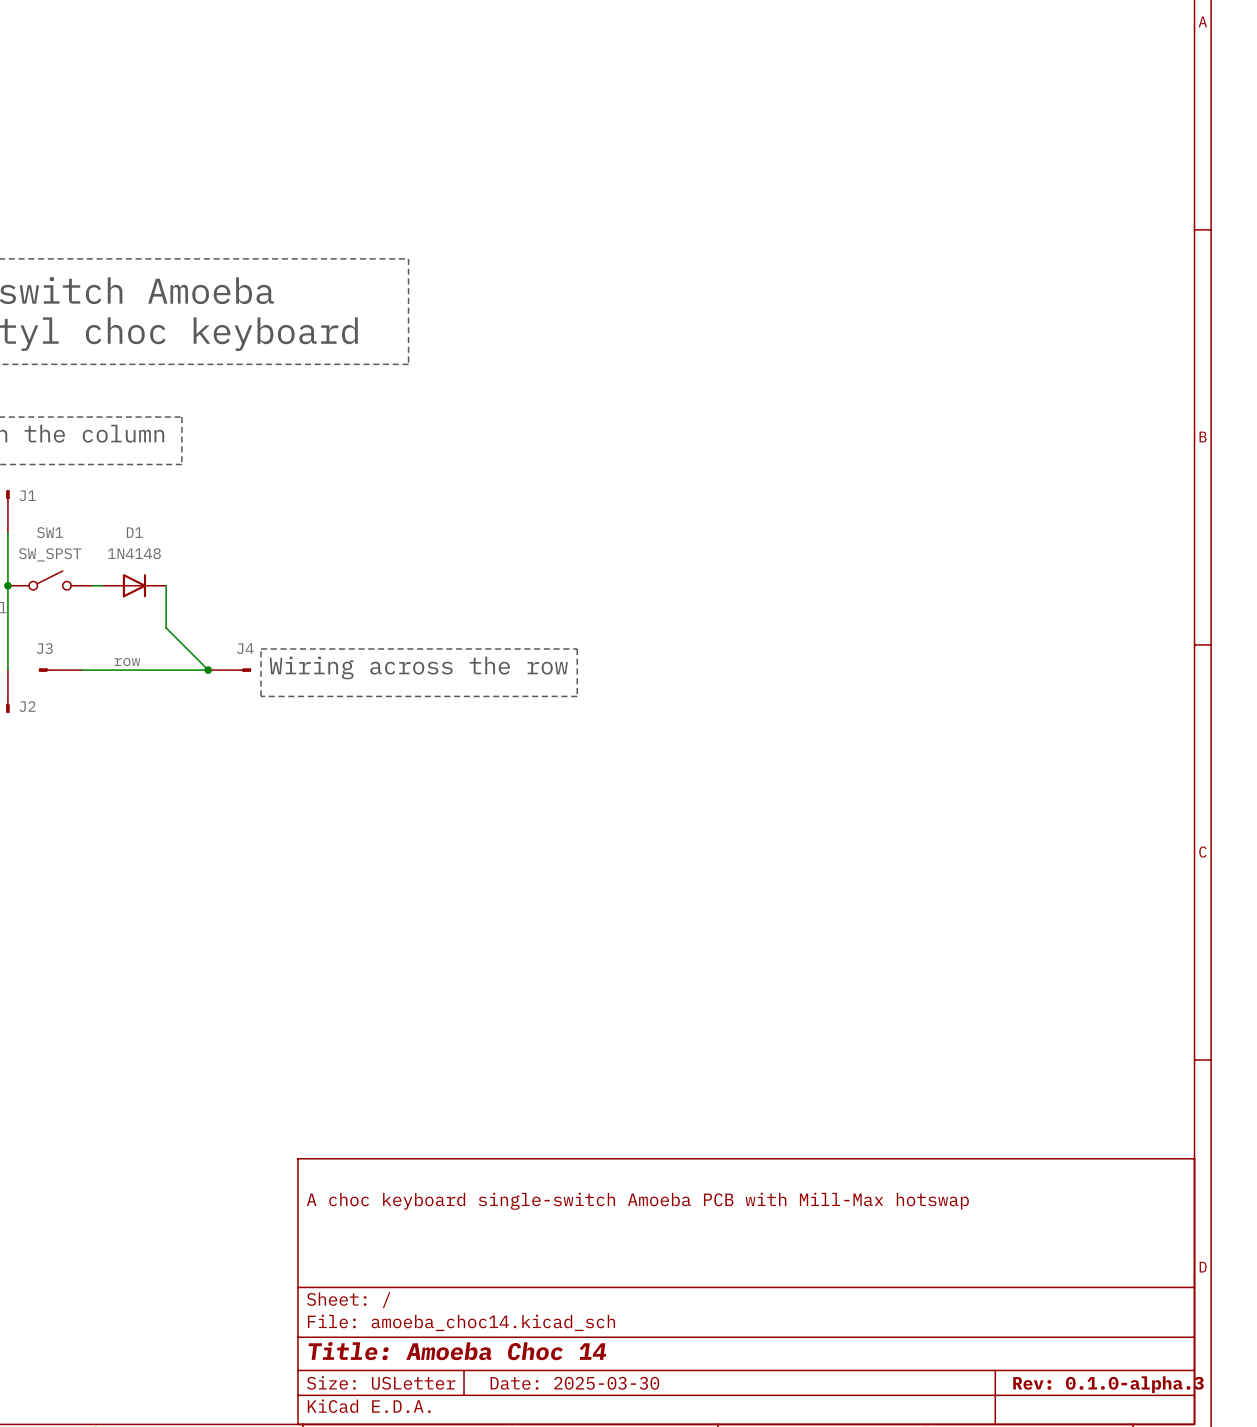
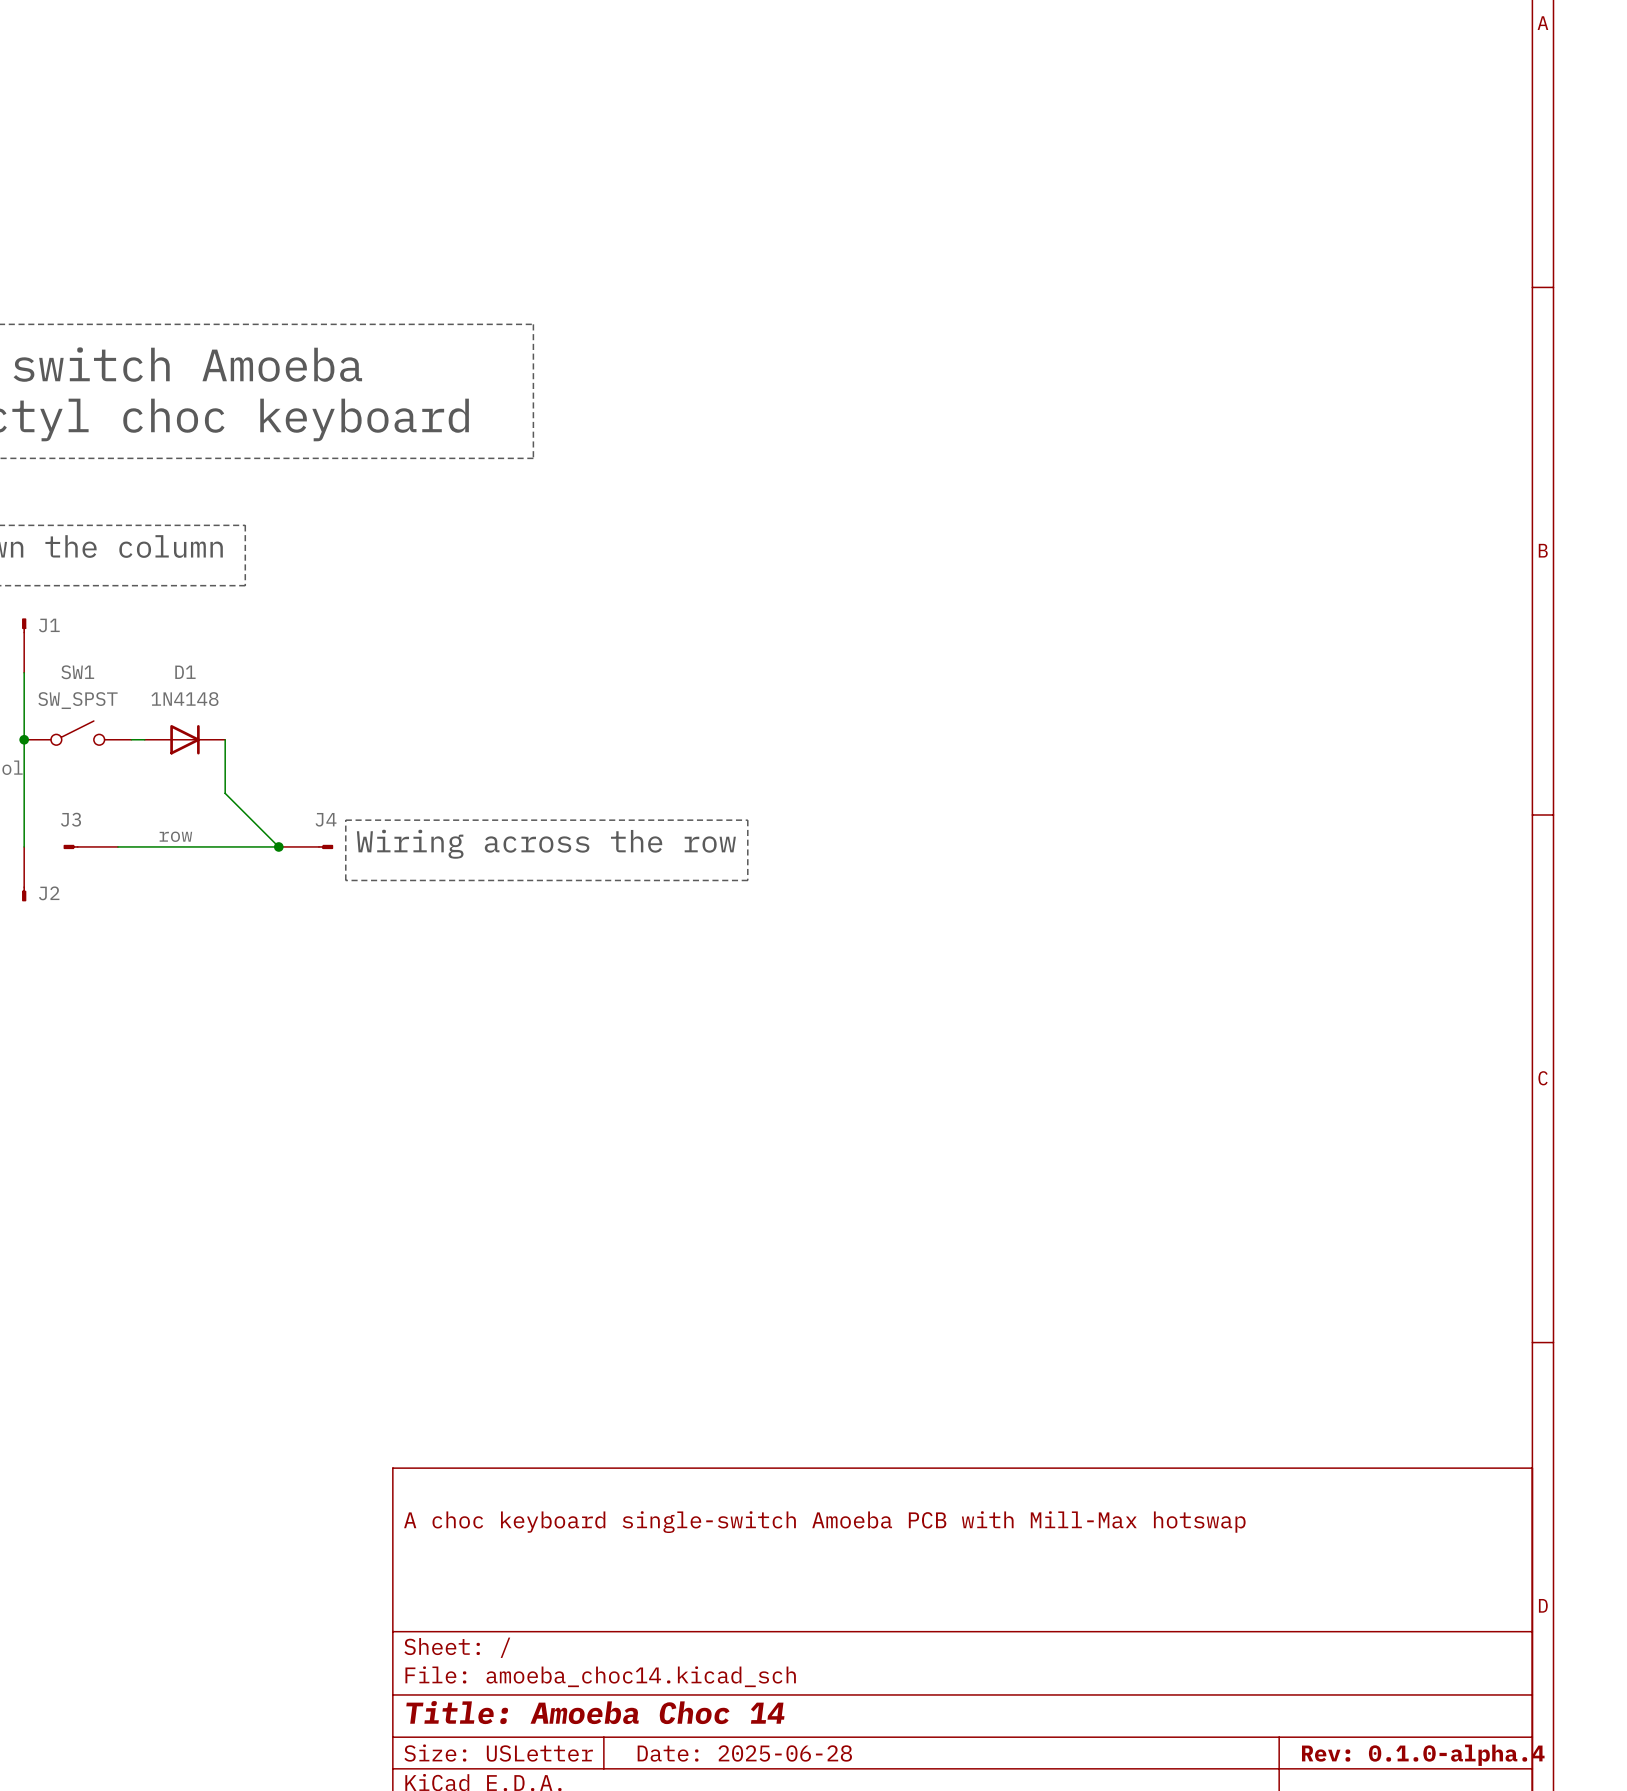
title block: Date: 2025-03-30 (574, 1383) -> Date: 2025-06-28 (744, 1753)
title block: Rev: 0.1.0-alpha.3 (1108, 1384) -> Rev: 0.1.0-alpha.4 (1423, 1755)

